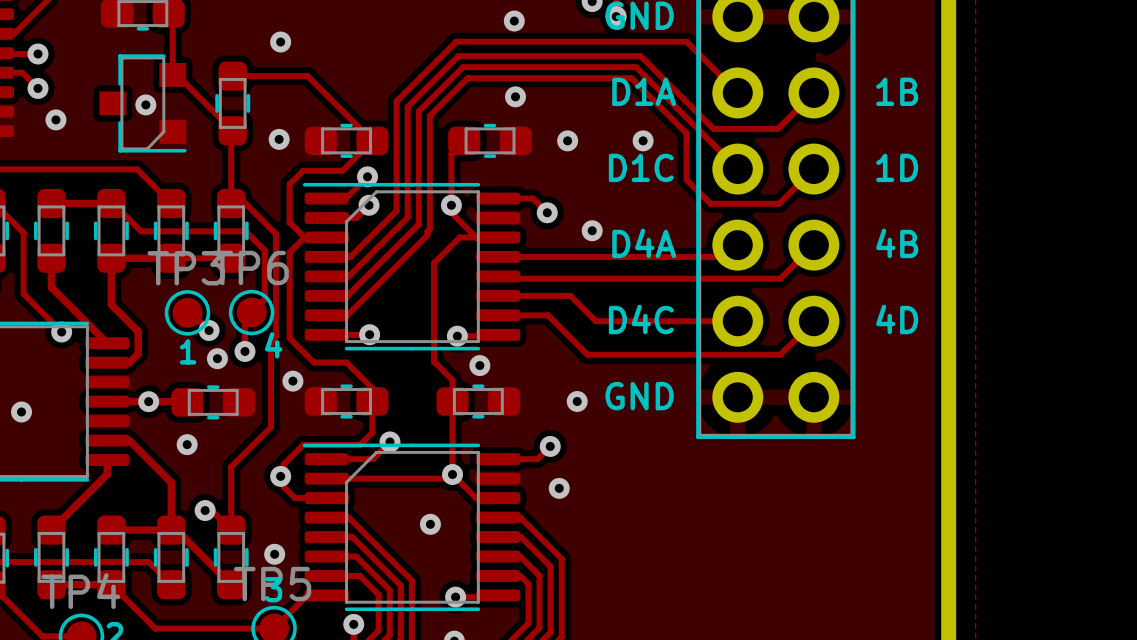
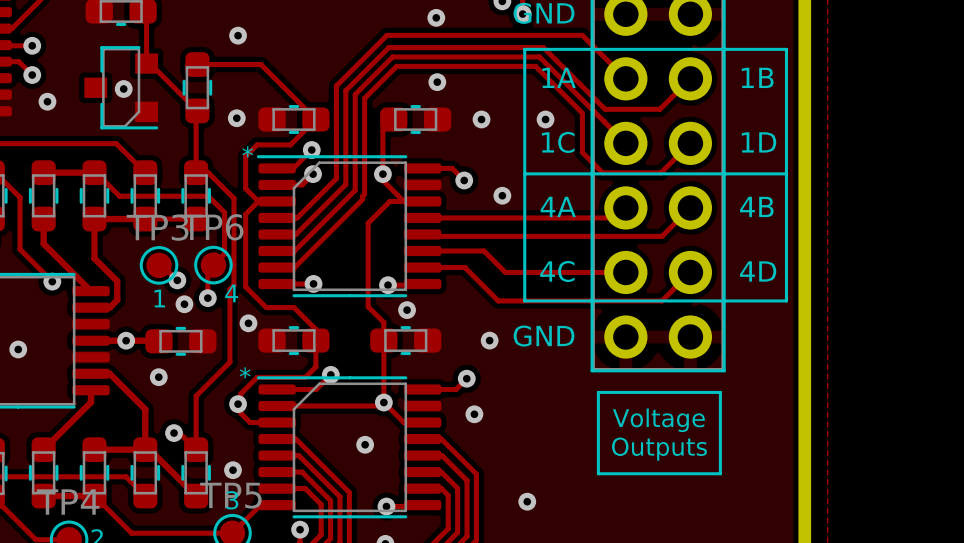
line: none -> (524, 49) (524, 300) (786, 300) (786, 49) (524, 49)
text: D1A (644, 91) -> 1A (559, 77)
text: D1C (641, 167) -> 1C (558, 142)
text: none -> * (247, 151)
line: none -> (524, 173) (786, 173)
text: D4A (644, 243) -> 4A (558, 206)
text: D4C (641, 319) -> 4C (557, 271)
text: none -> * (245, 372)
line: none -> (598, 392) (598, 473) (720, 473) (720, 392) (598, 392)
text: none -> Voltage (658, 420)
text: none -> Outputs (659, 449)
via: none -> (527, 501)

